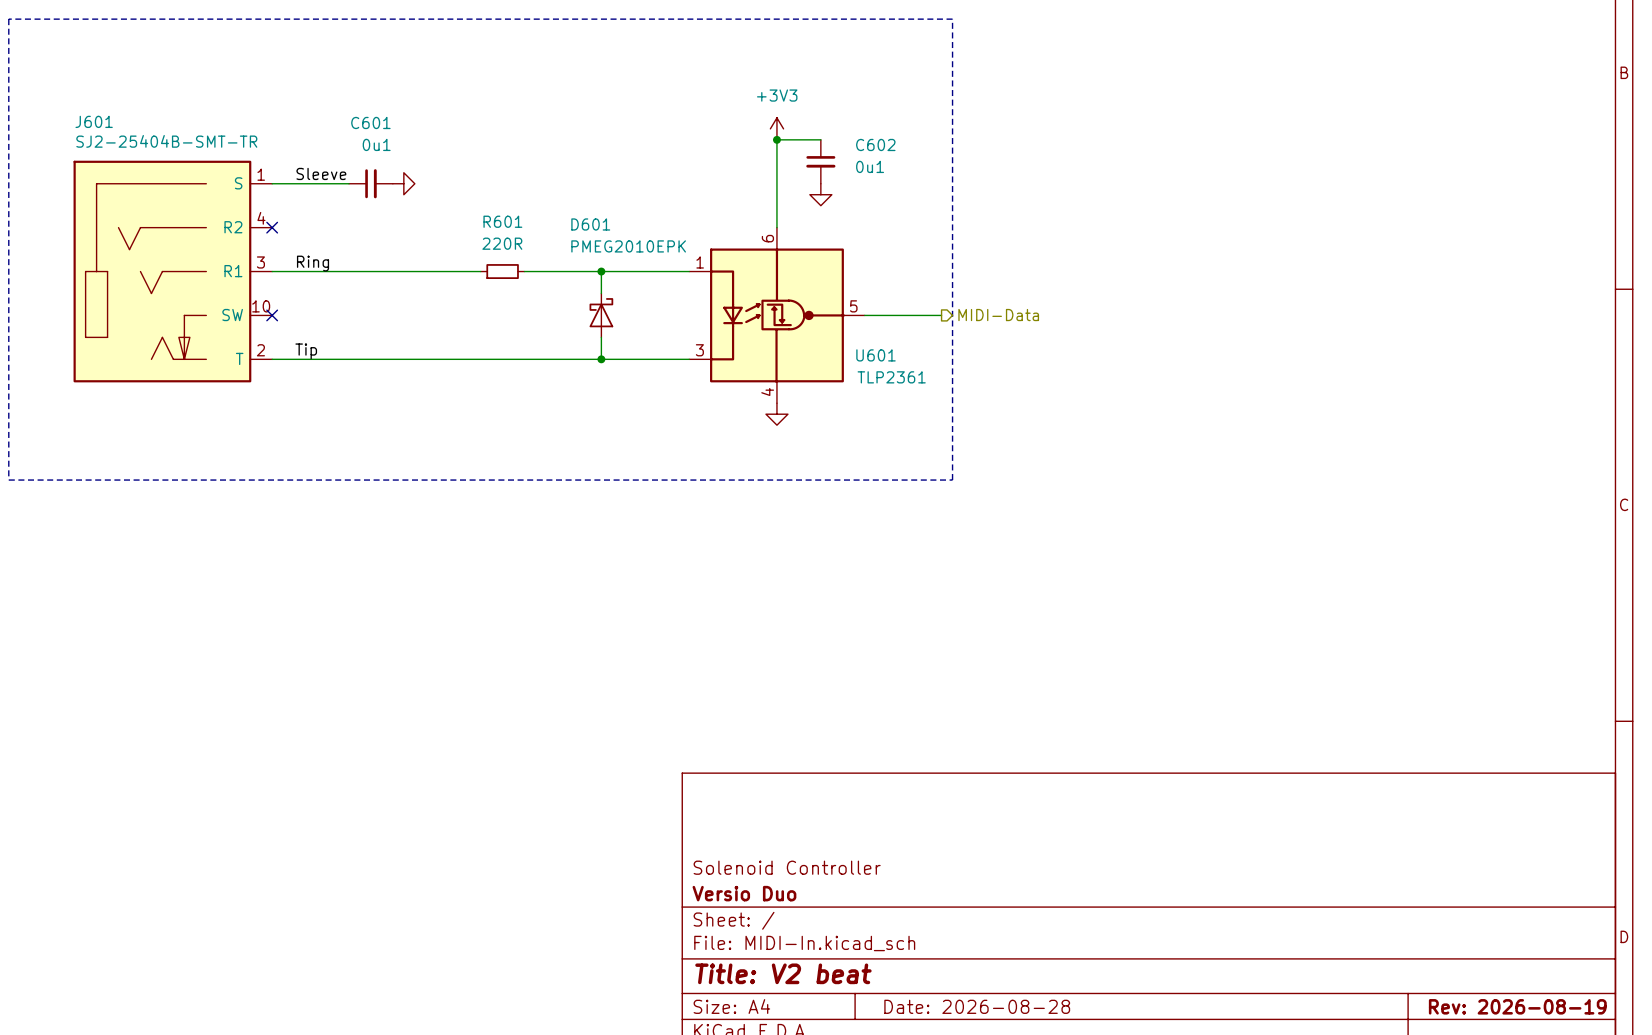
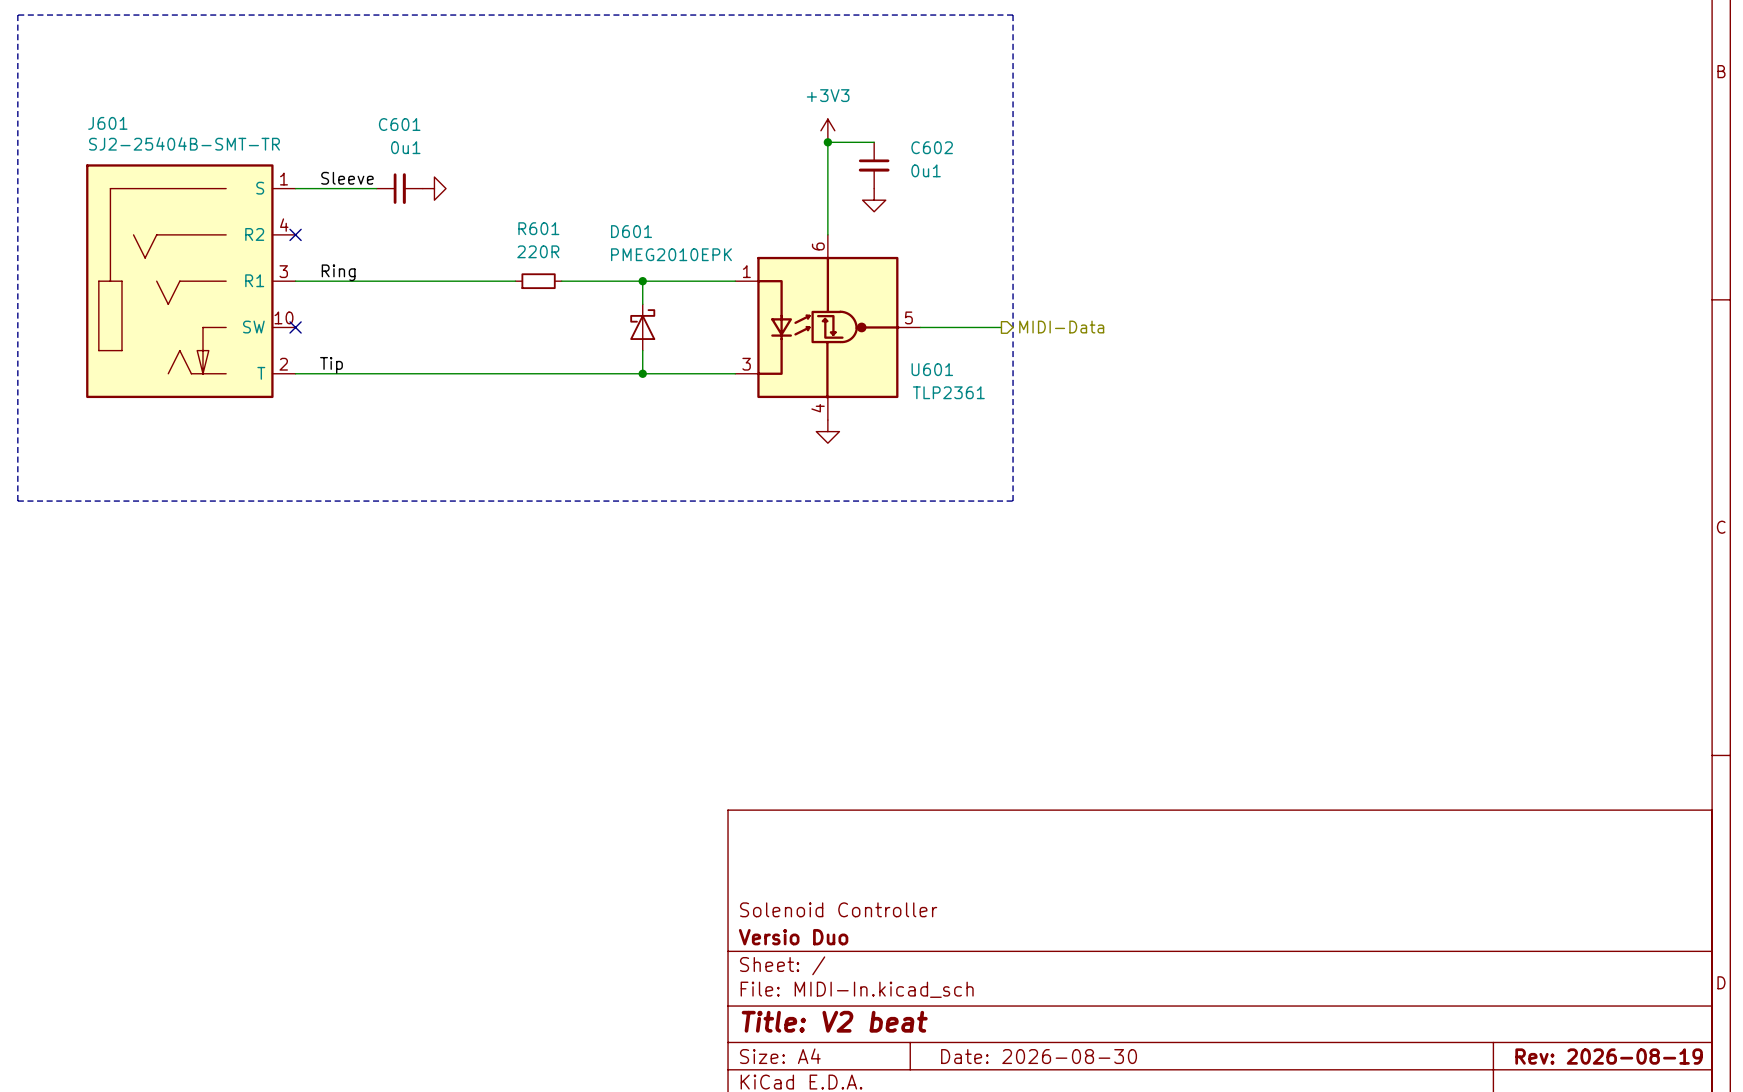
title block: Date: 2026-08-28 (977, 1006) -> Date: 2026-08-30 (1039, 1056)

